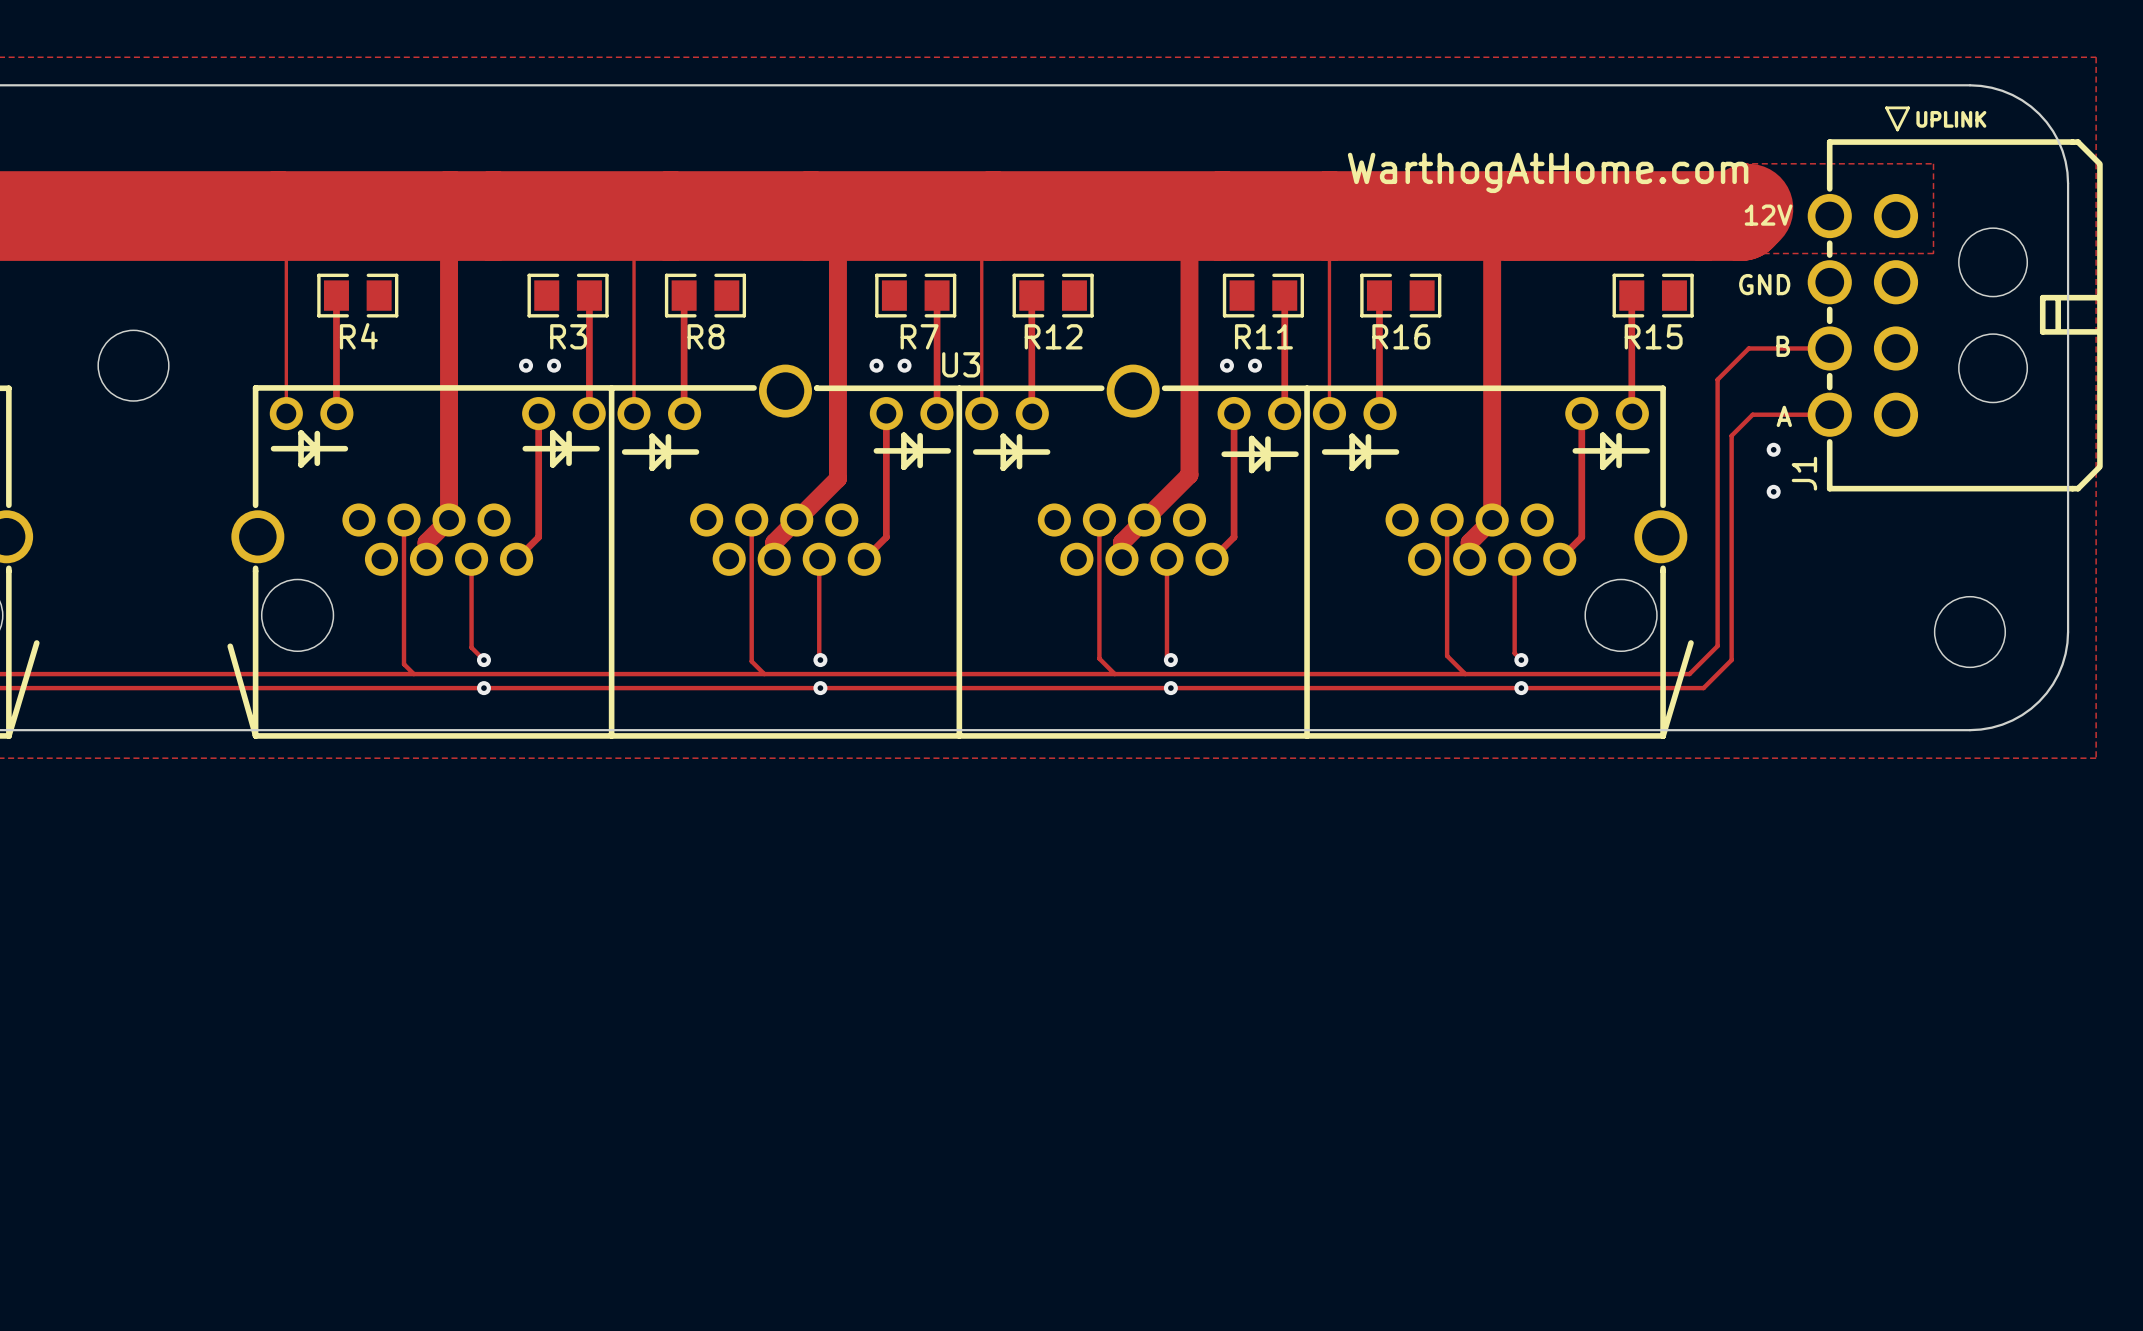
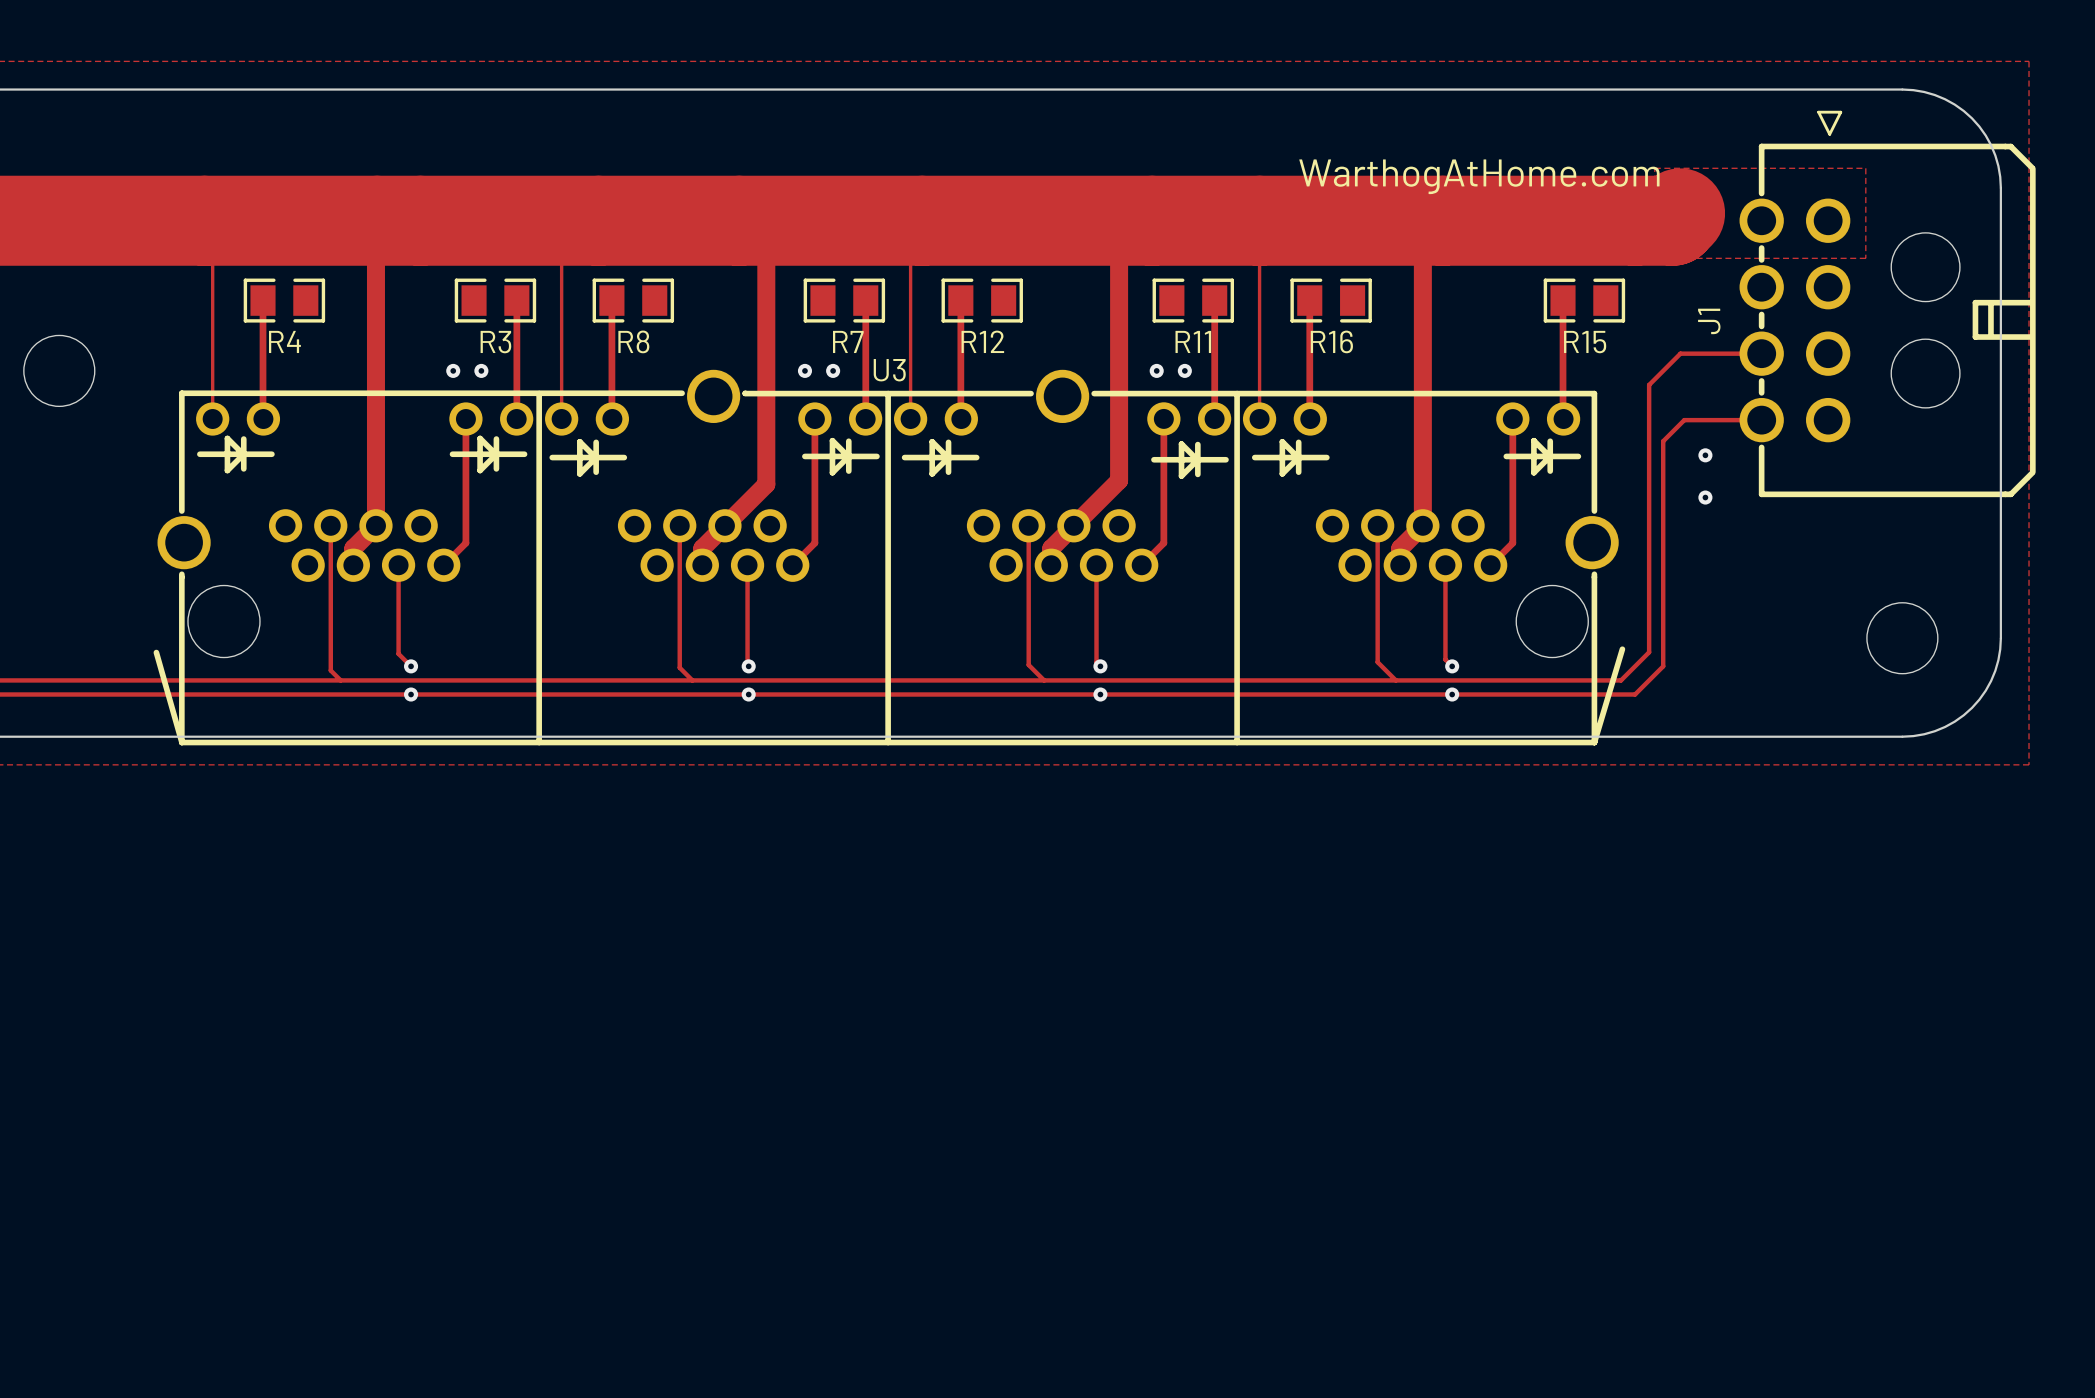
J1 text: UPLINK (1951, 119) -> none
text: 12V (1768, 215) -> none
text: GND (1764, 284) -> none
text: B (1783, 346) -> none
text: A (1784, 416) -> none
J1 name position: J1 (1804, 473) -> J1 (1709, 321)

